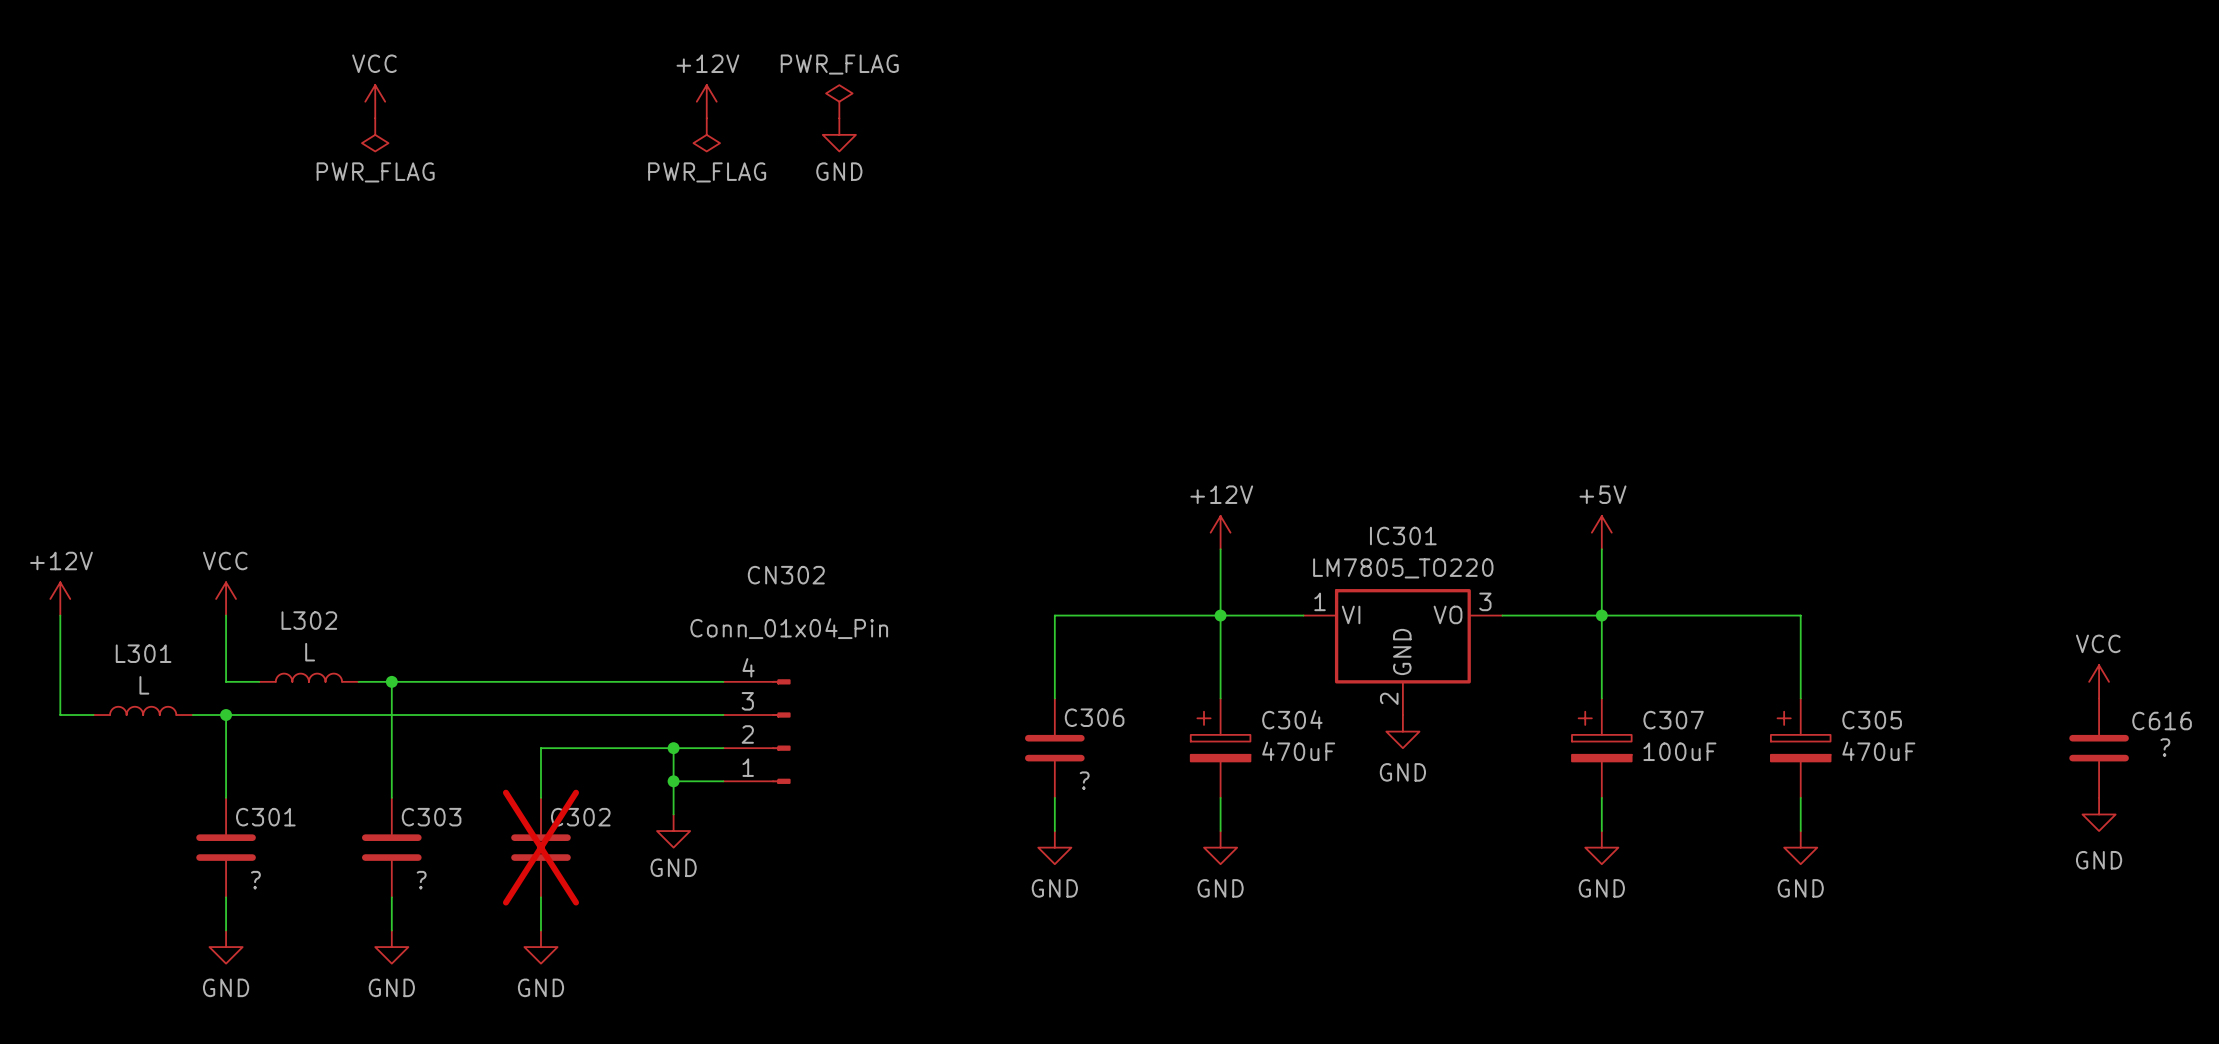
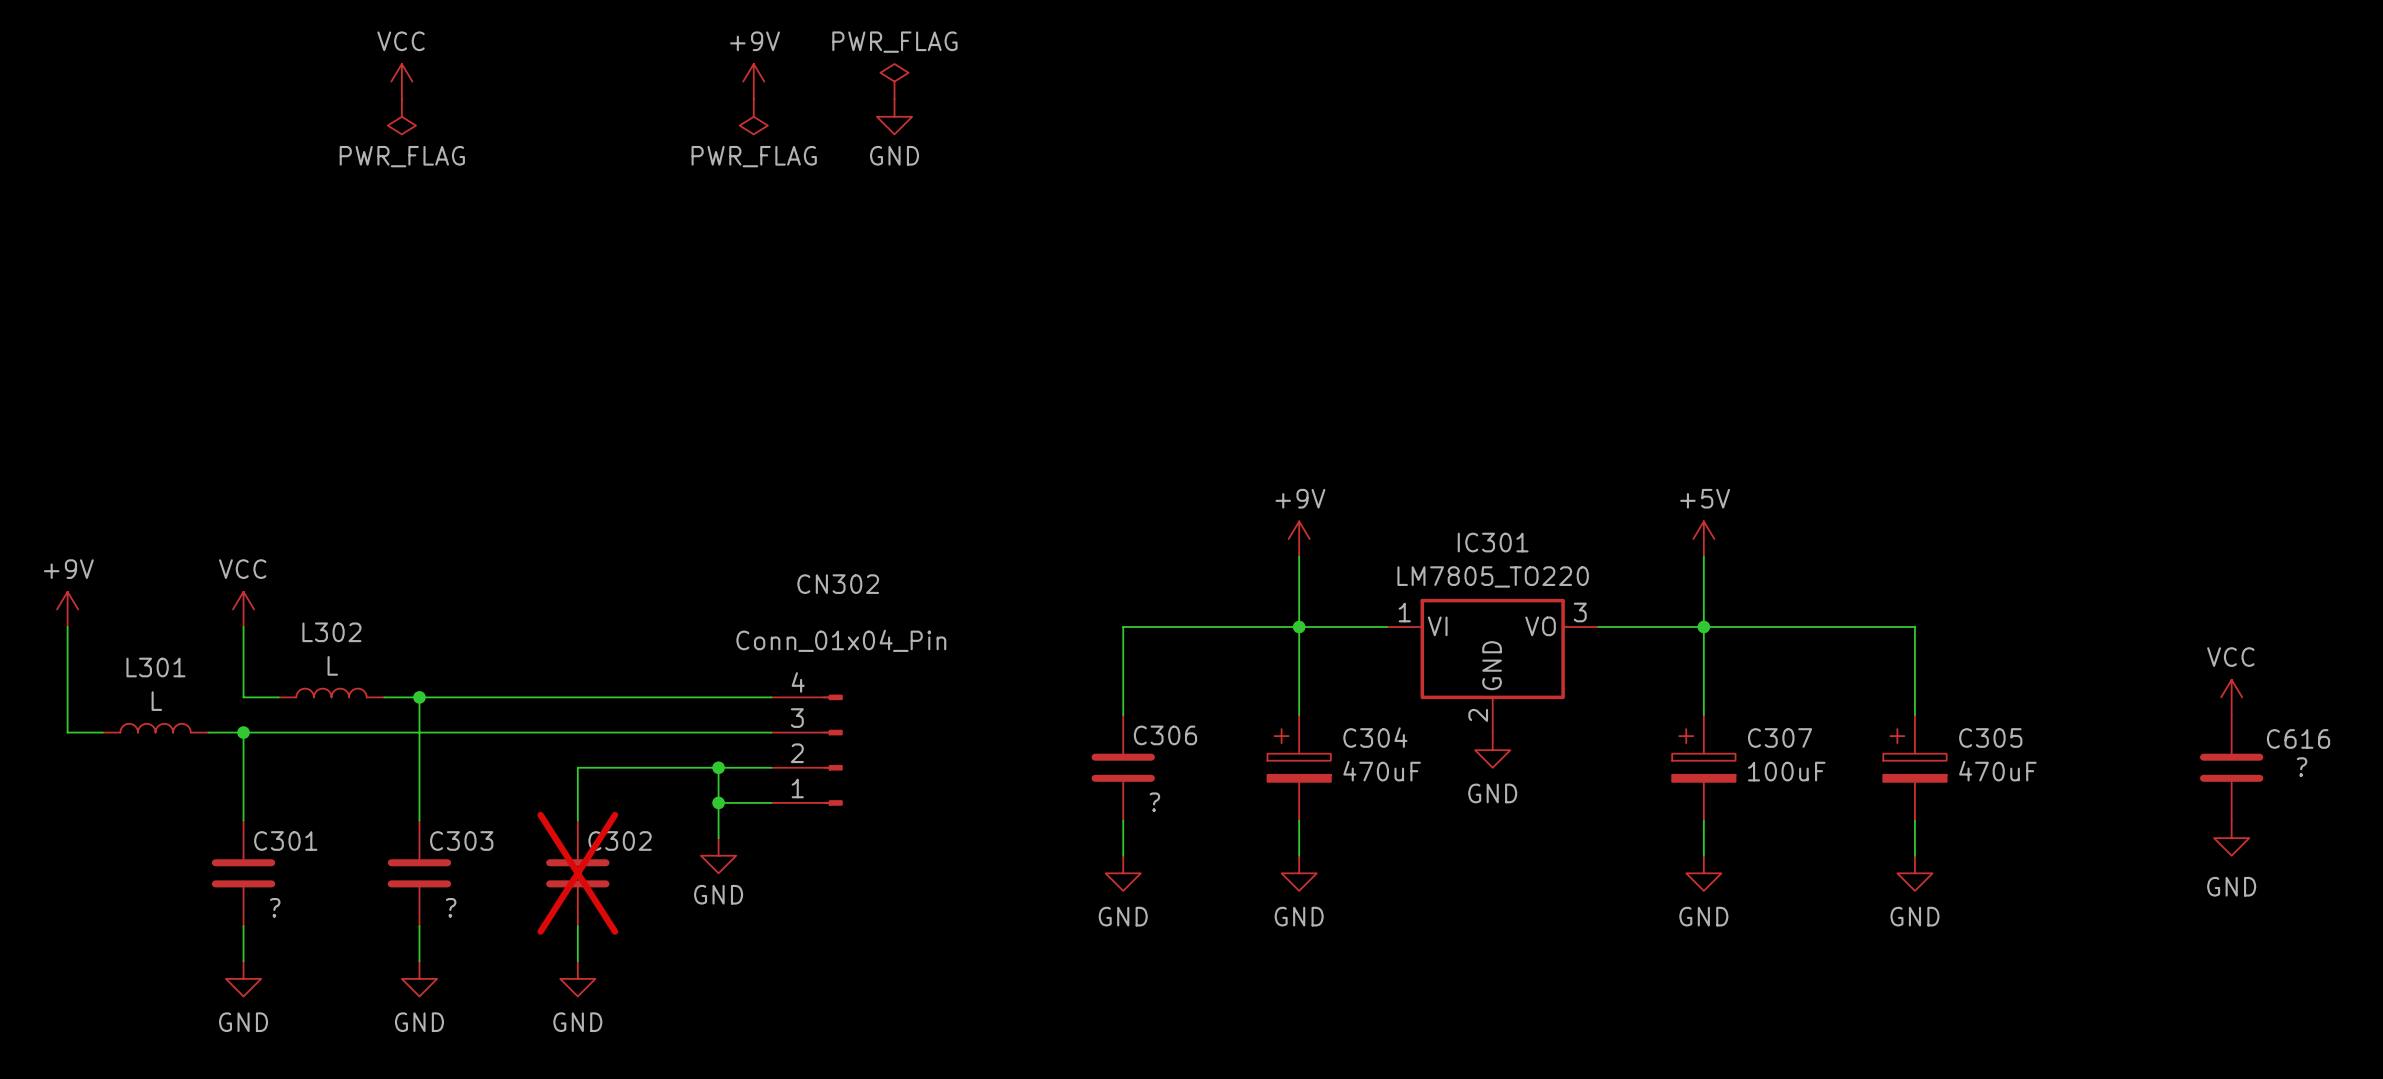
power symbol: +12V (706, 101) -> +9V (753, 81)
power symbol: +12V (1220, 532) -> +9V (1299, 539)
power symbol: +12V (60, 598) -> +9V (67, 609)

